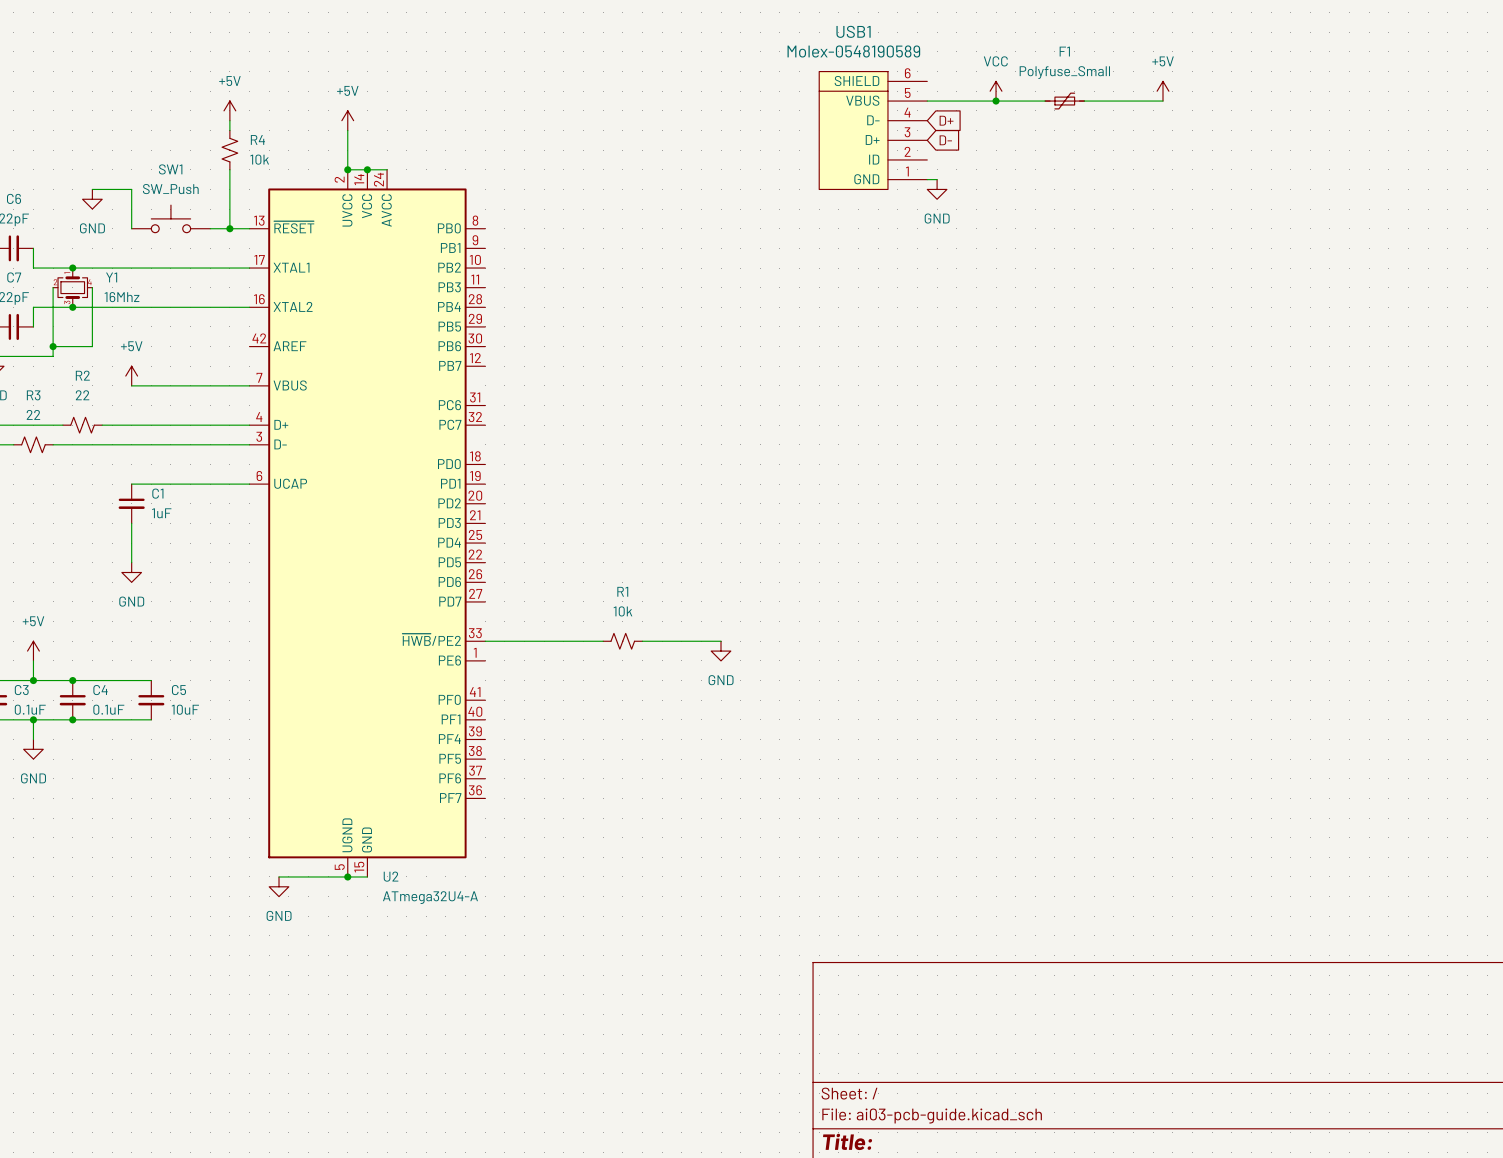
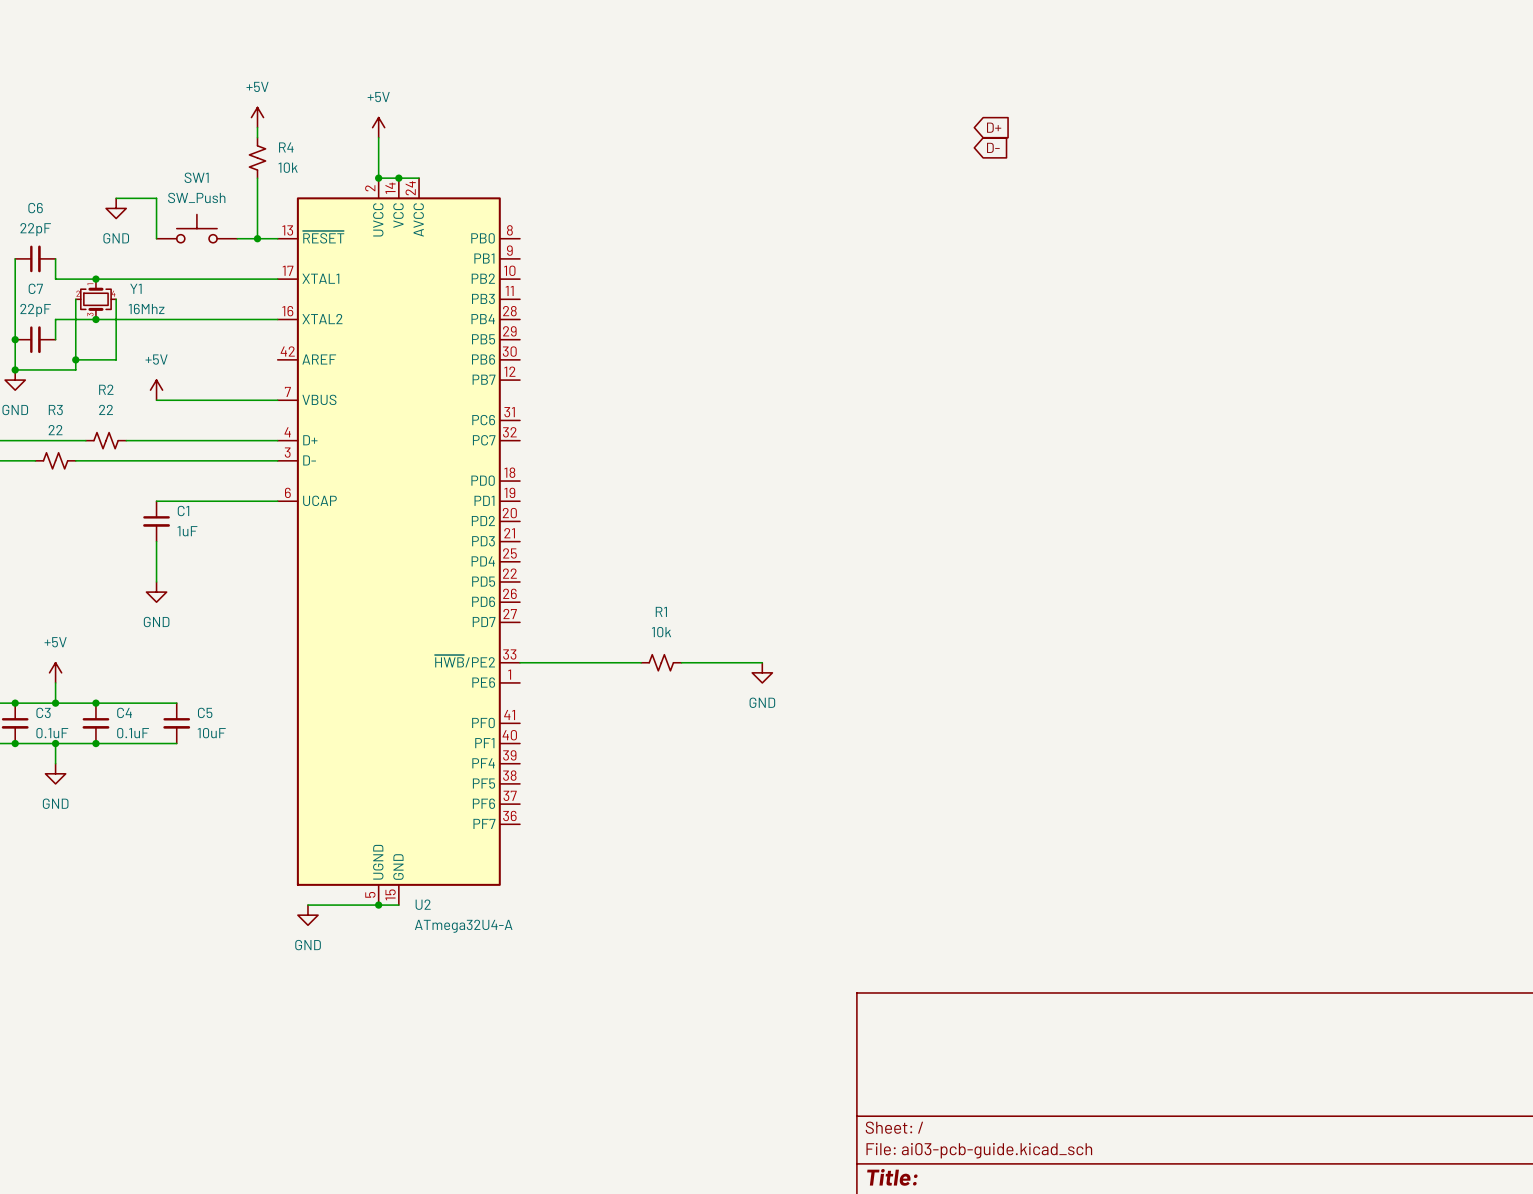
power symbol: VCC (996, 91) -> none
power symbol: +5V (1163, 91) -> none
wire: (927, 101) (1045, 101) -> none
junction: (996, 101) -> none
F1: Polyfuse_Small (1064, 101) -> none
wire: (1084, 101) (1163, 101) -> none
USB1: Molex-0548190589 (873, 130) -> none
wire: (927, 179) (937, 179) -> none
power symbol: GND (937, 189) -> none

